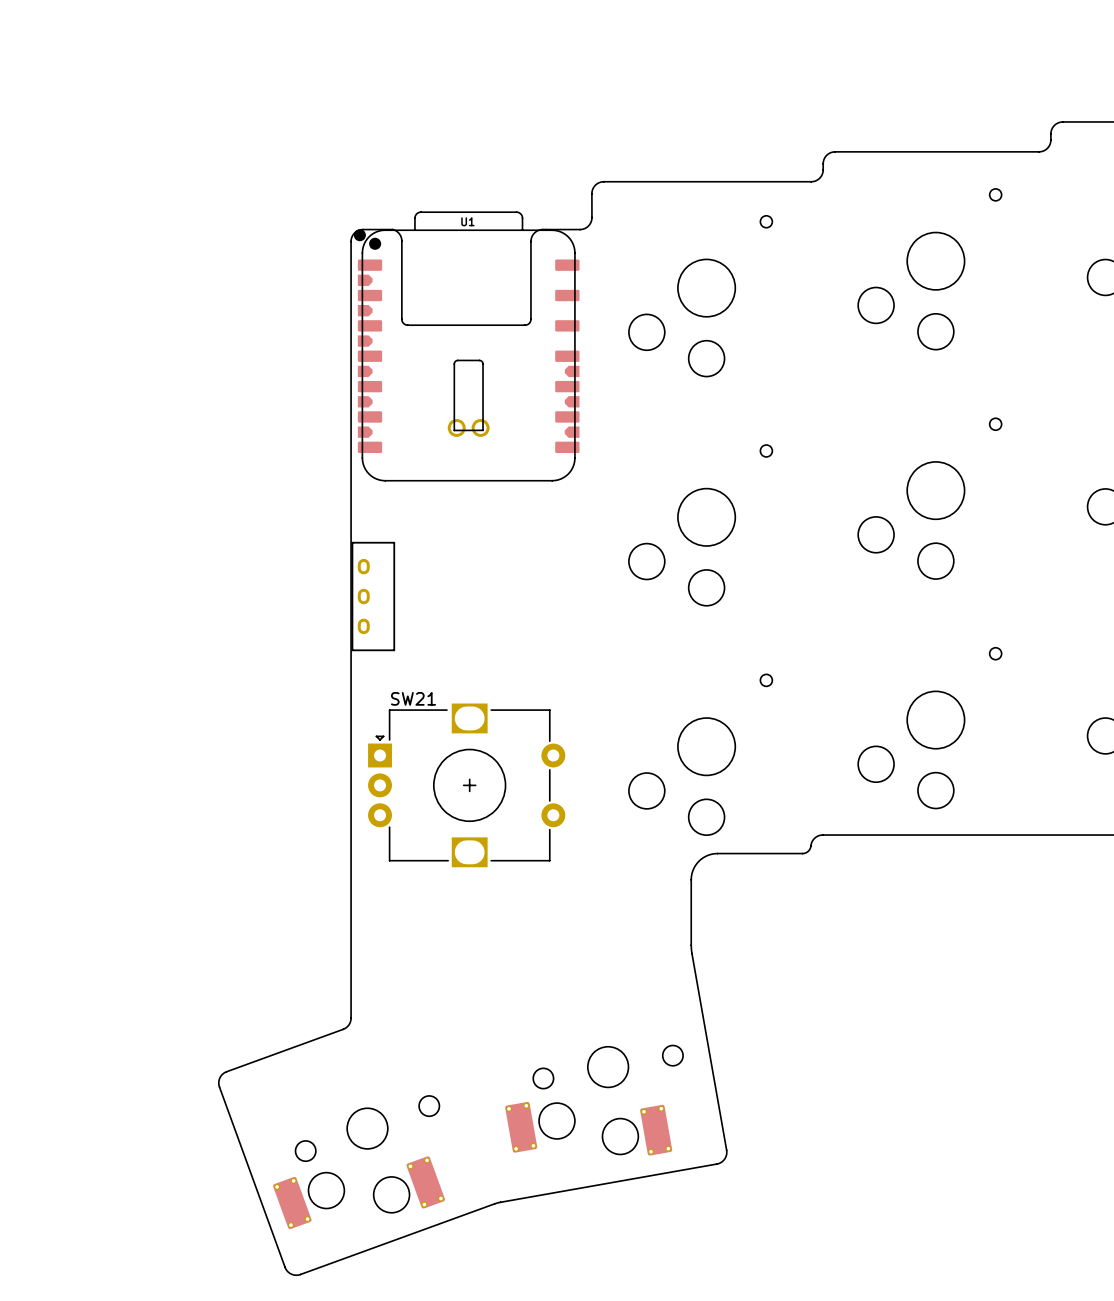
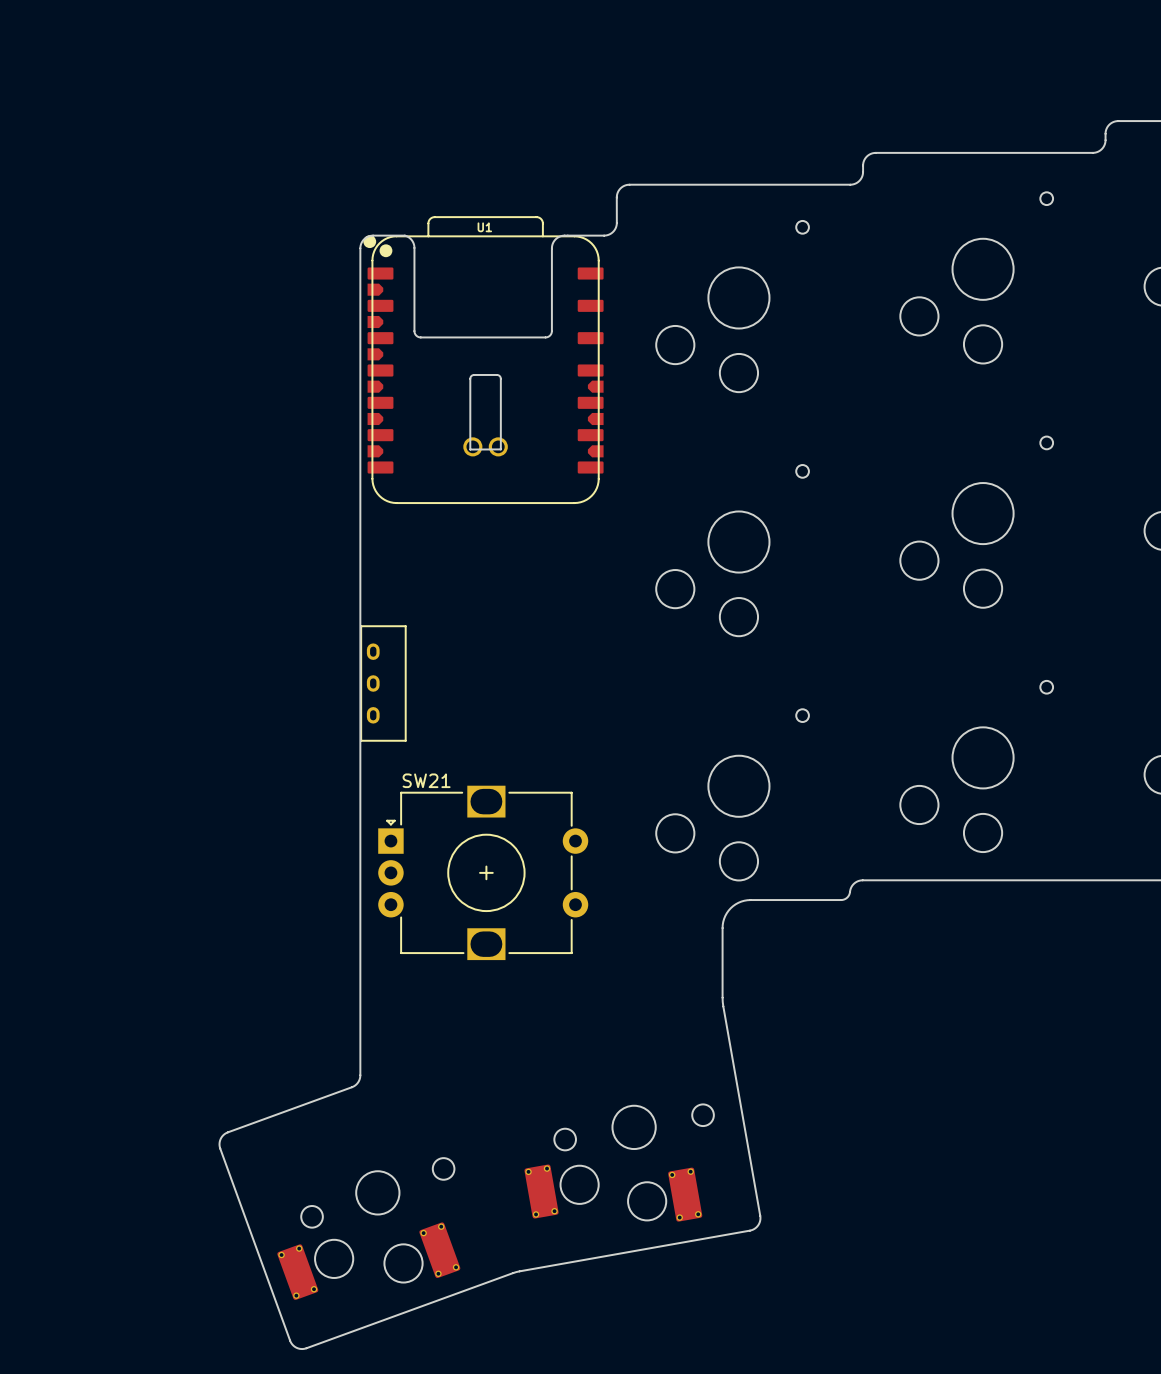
part position: (373, 596) -> (383, 683)
SW21 position: (466, 785) -> (483, 872)

